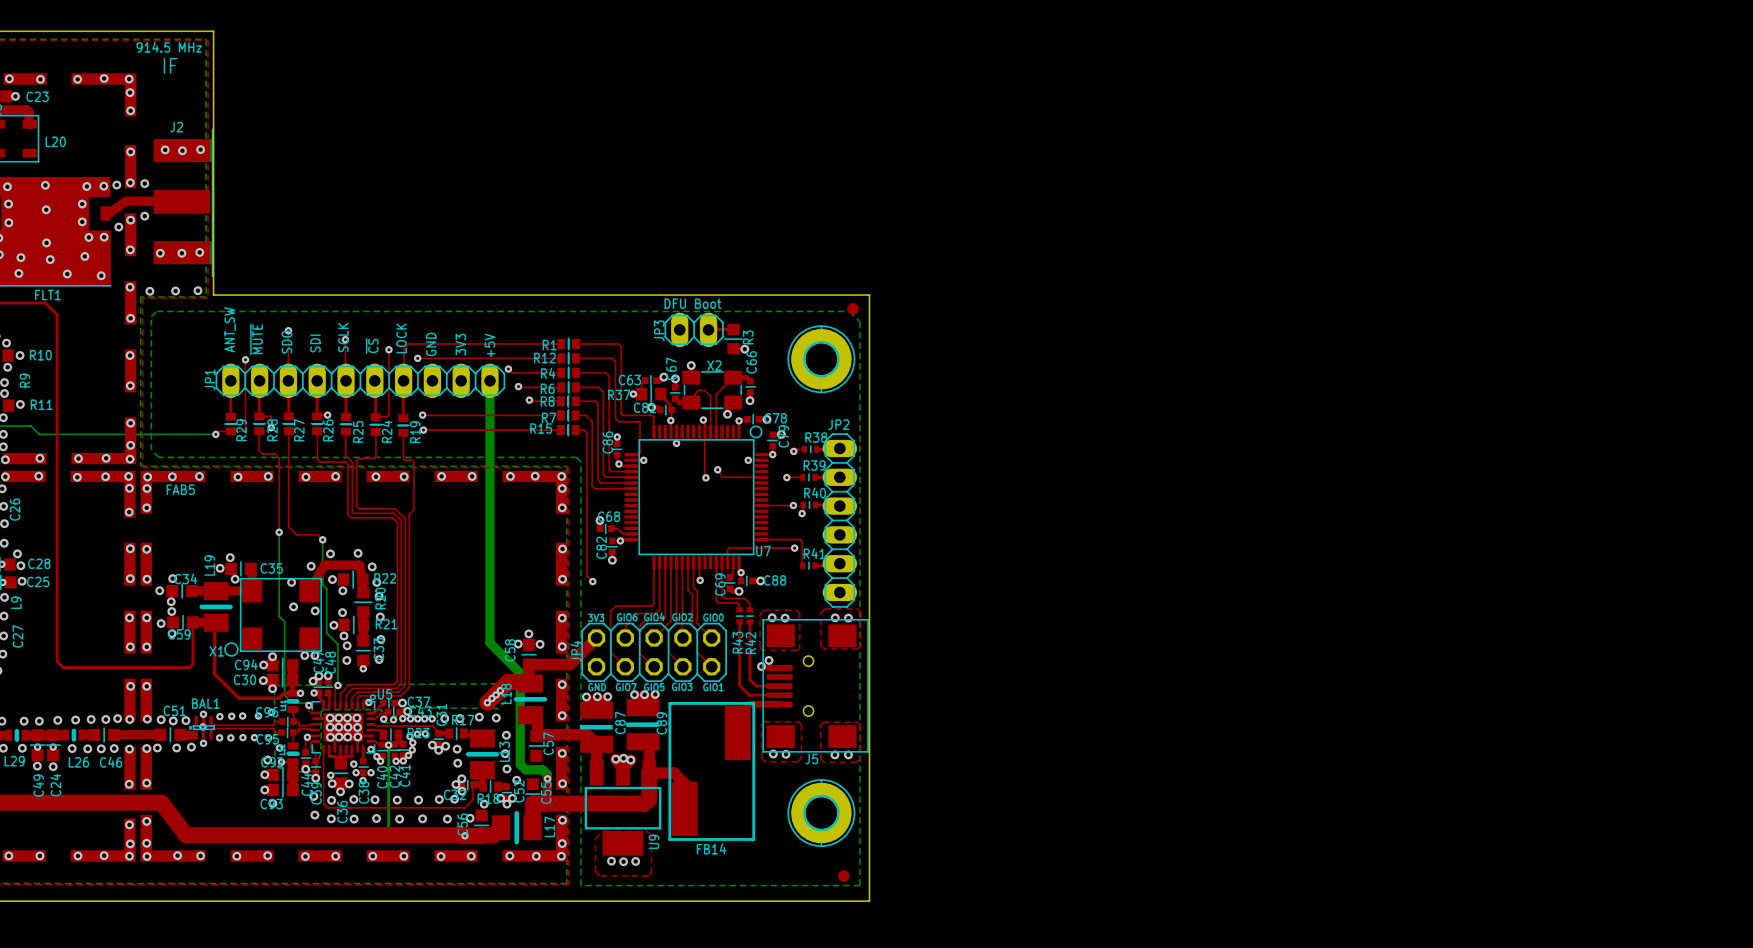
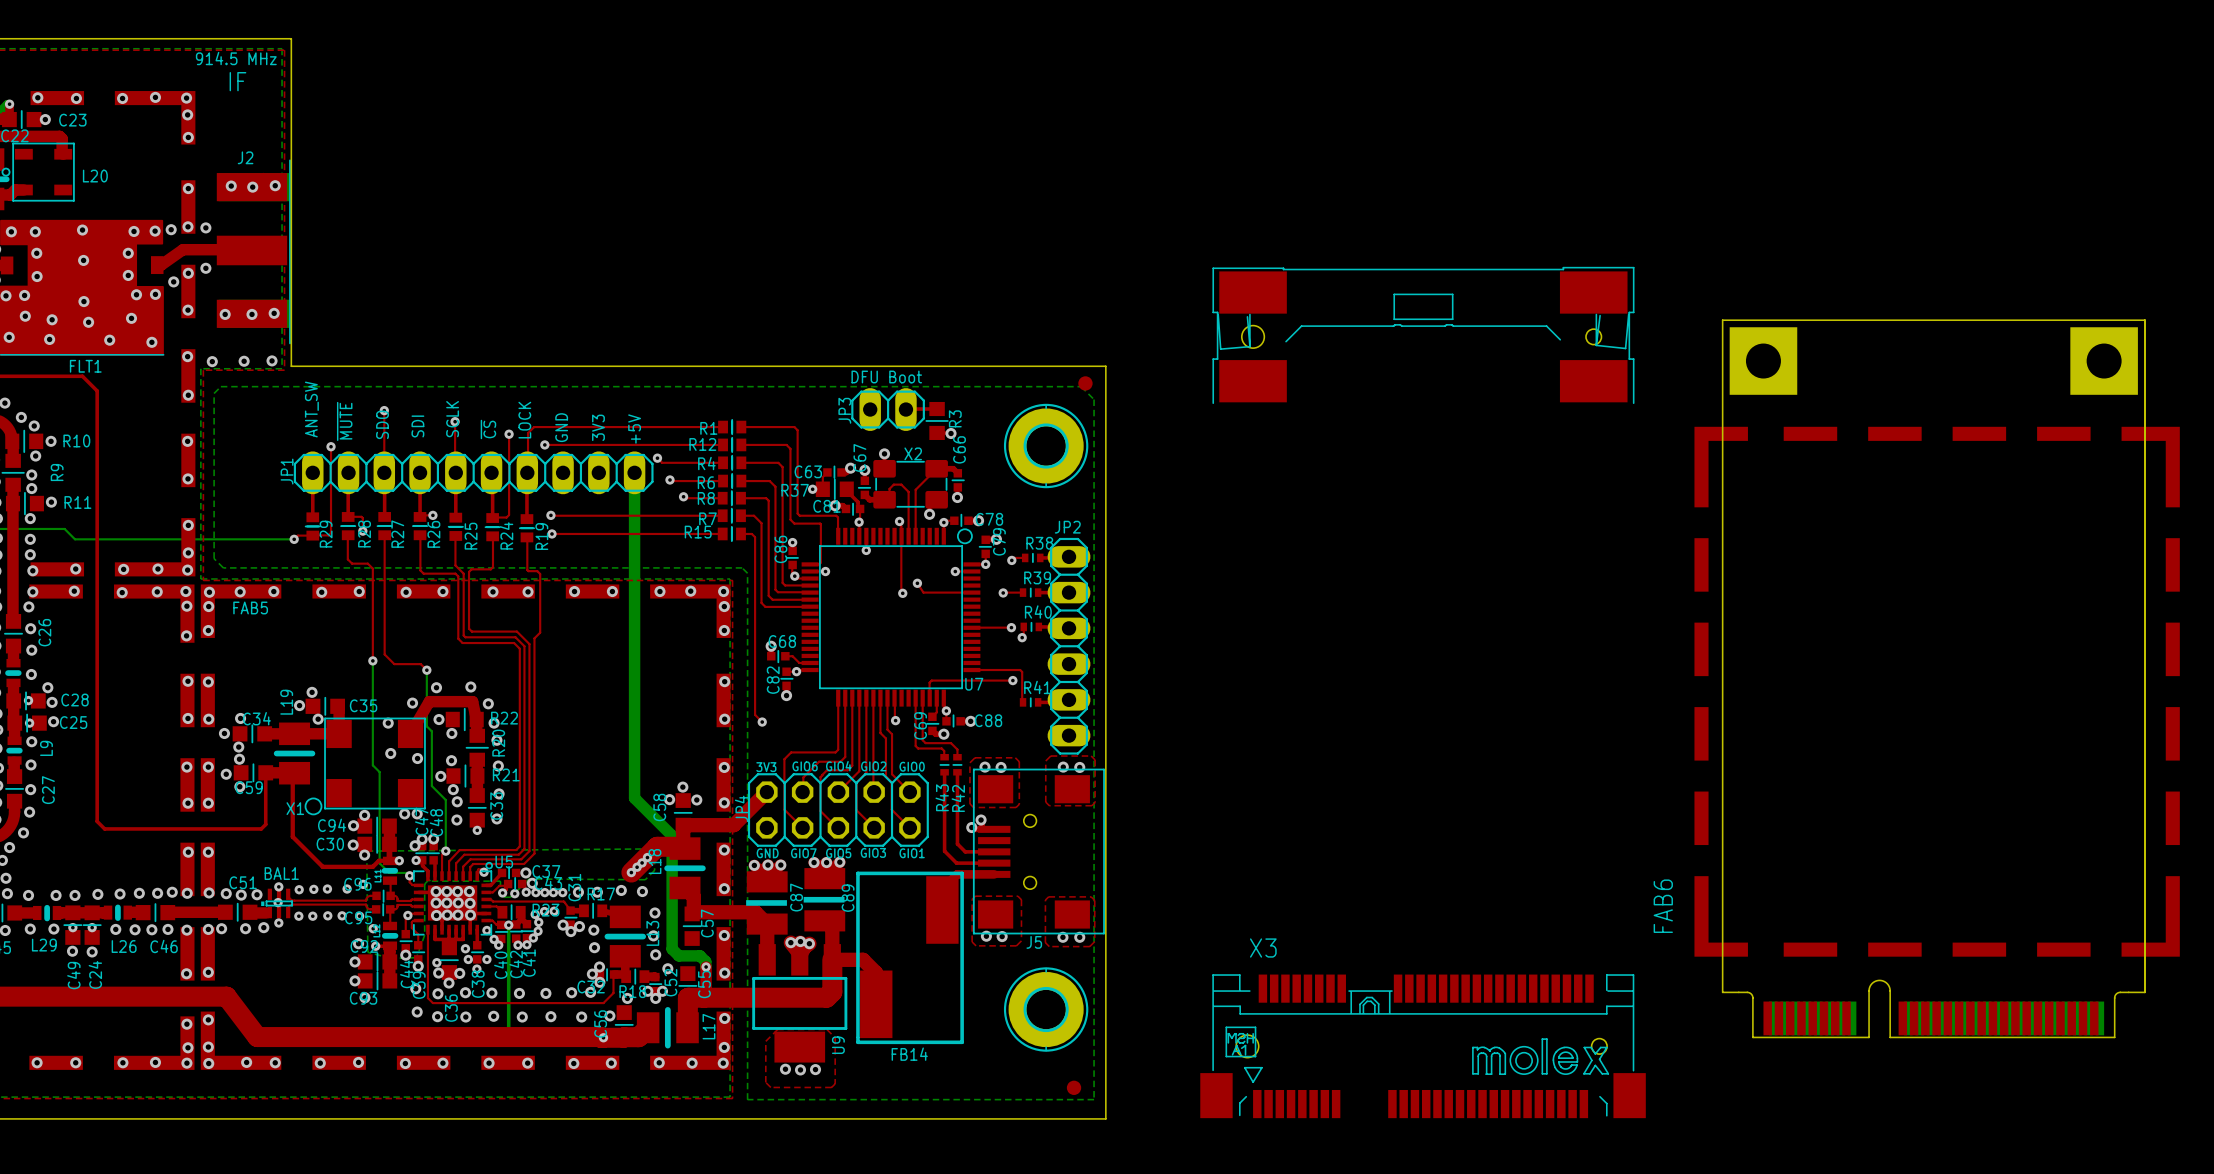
part: none -> (1933, 678)
X3: none -> (1423, 692)
FAB6: none -> (1937, 691)

